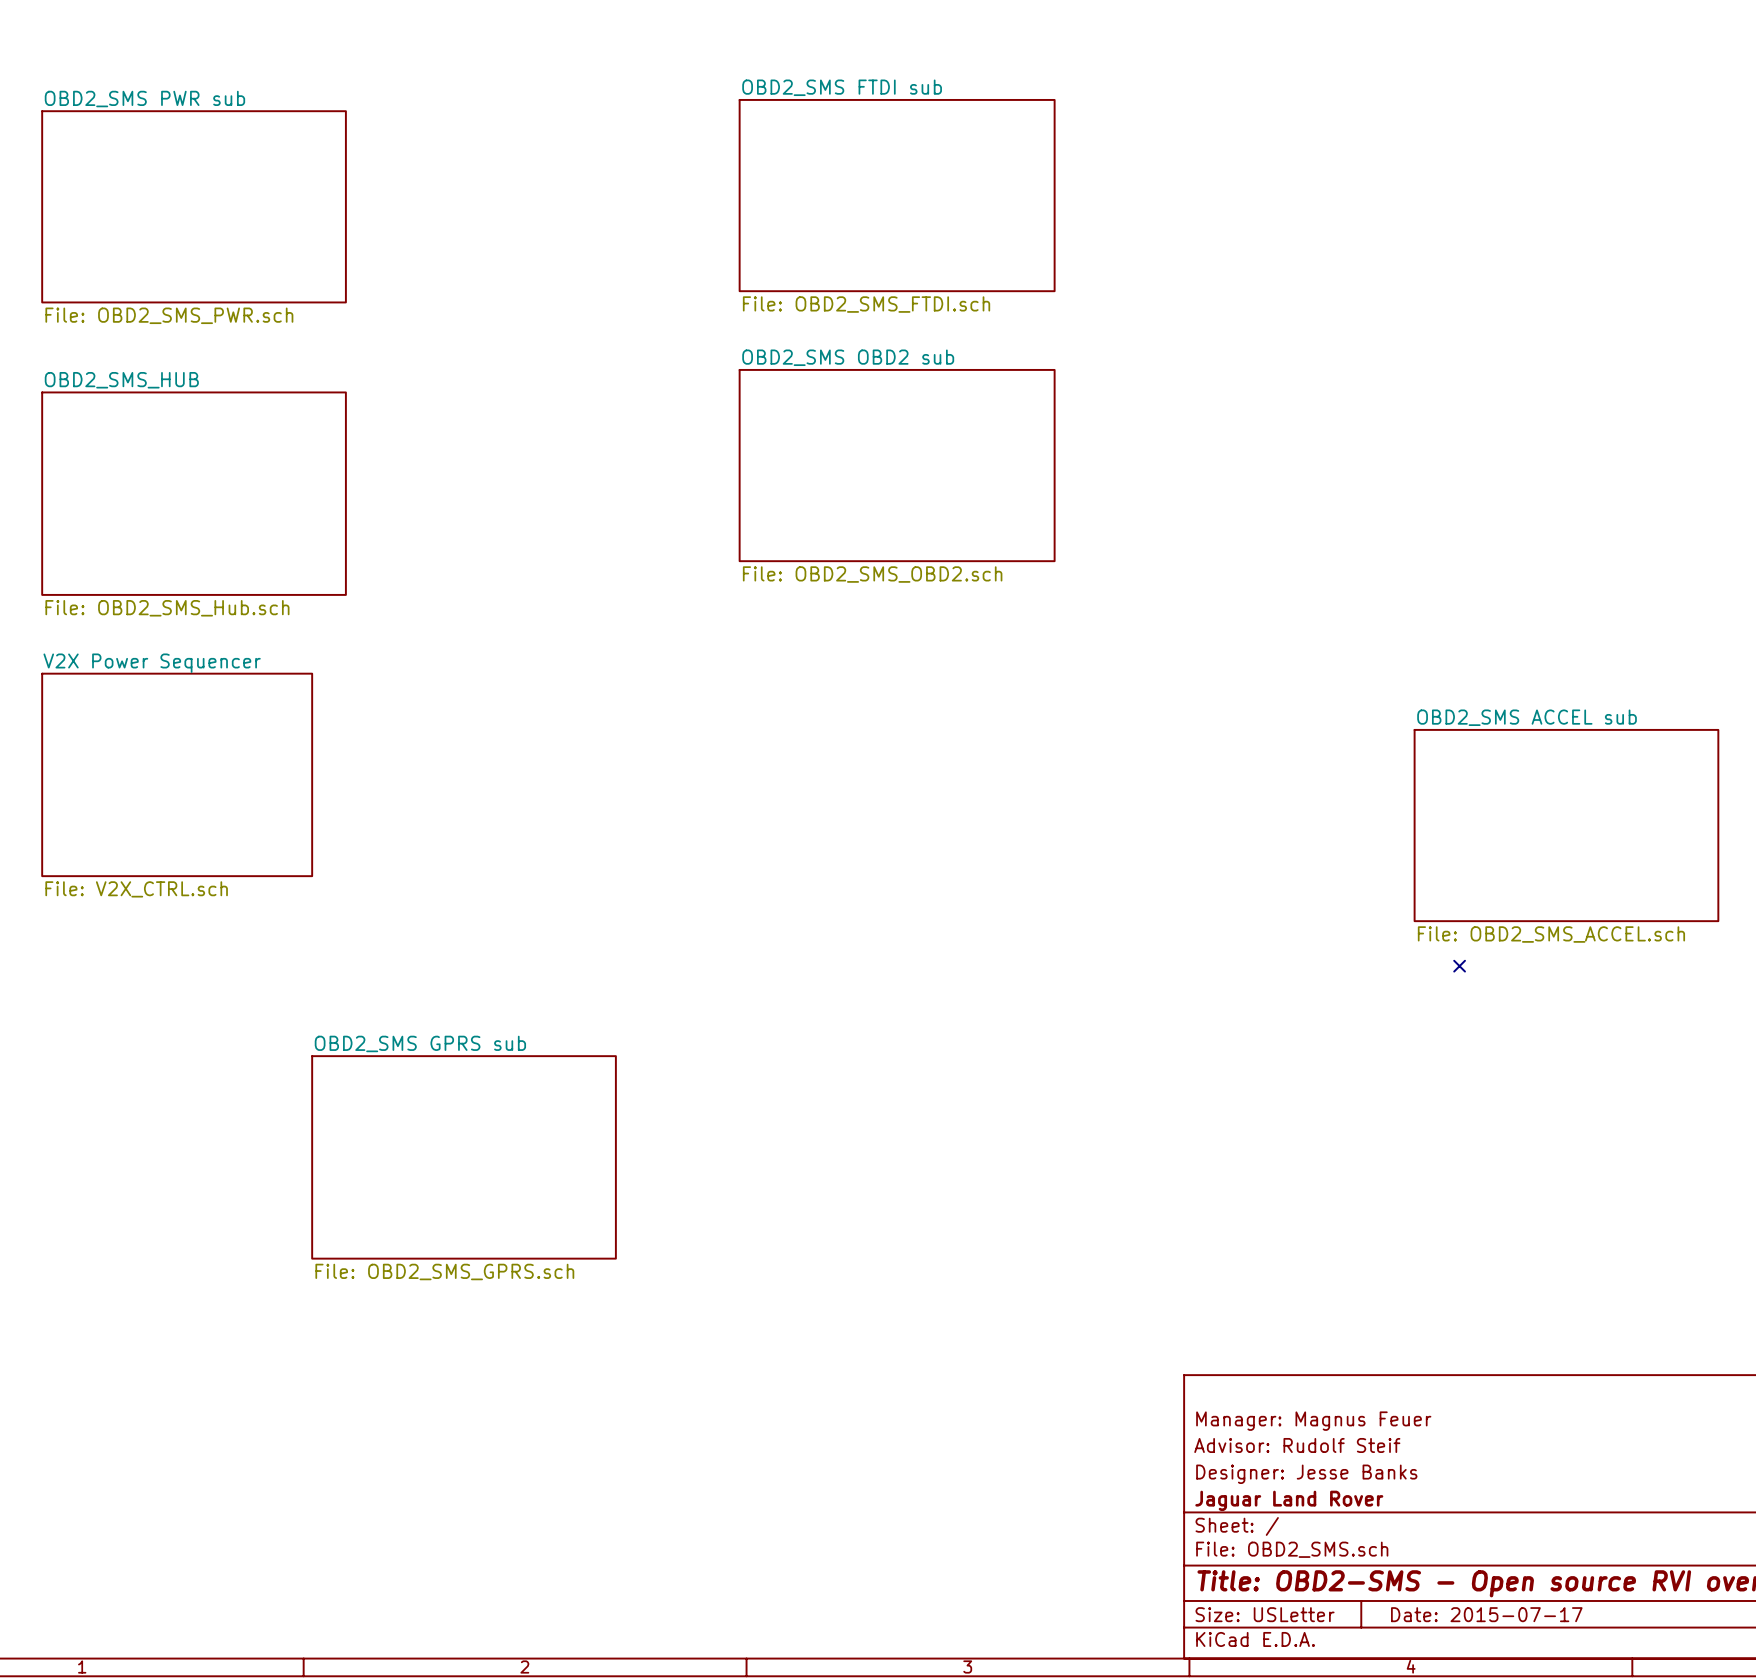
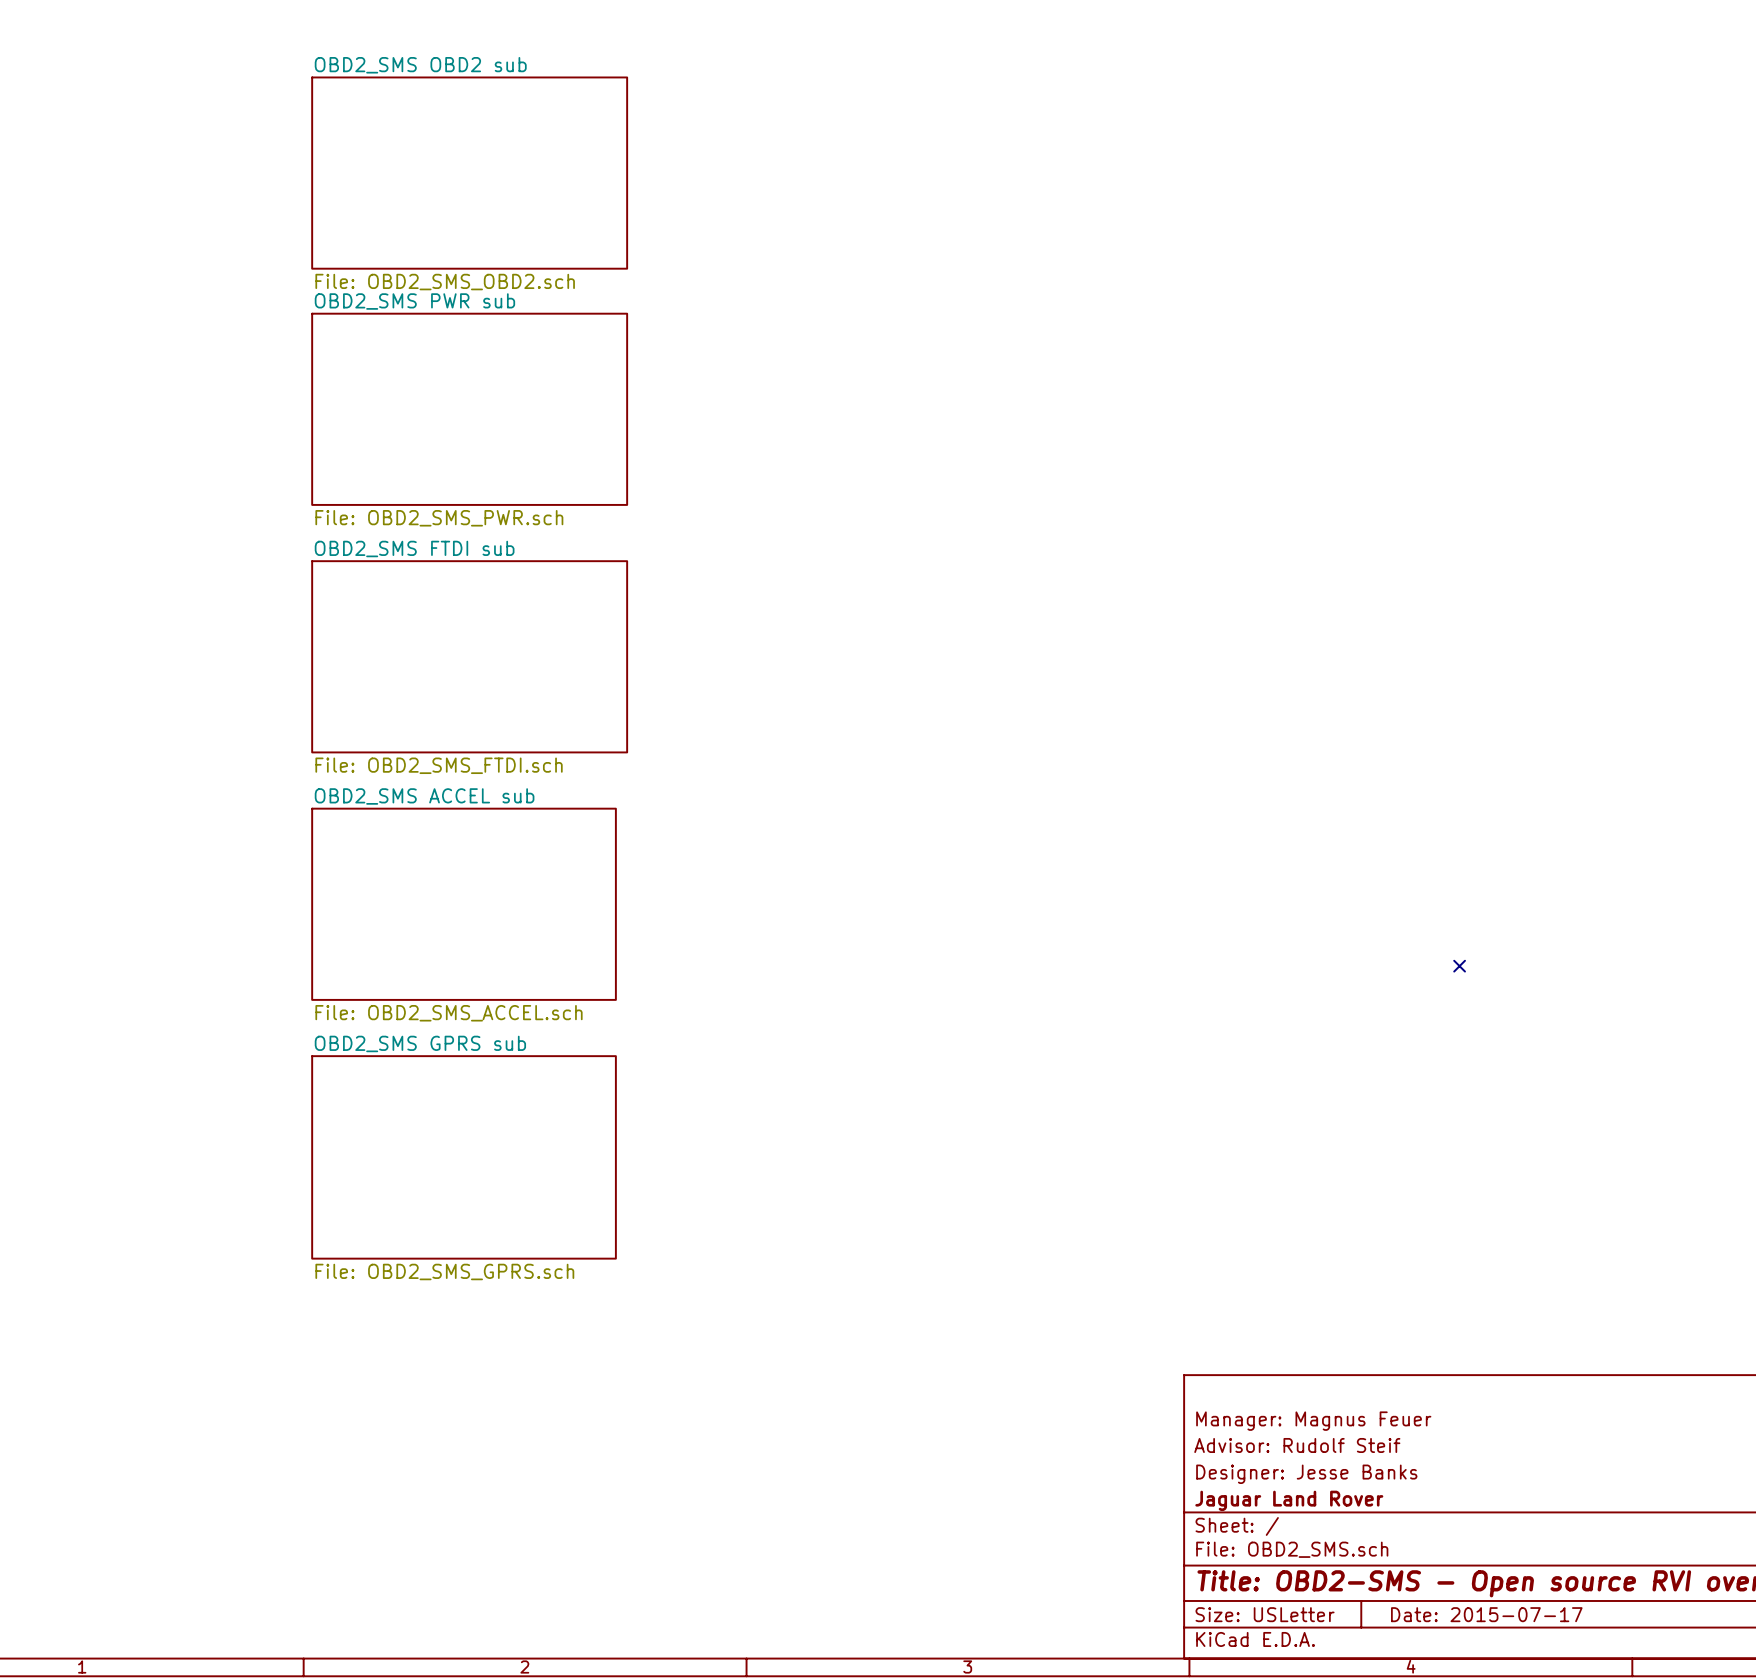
sheet OBD2_SMS PWR sub shape: [42, 111, 346, 303] -> [312, 313, 628, 505]
sheet OBD2_SMS FTDI sub position: (897, 195) -> (469, 656)
sheet OBD2_SMS OBD2 sub position: (897, 465) -> (469, 173)
sheet OBD2_SMS_HUB: File: OBD2_SMS_Hub.sch (194, 493) -> none
sheet V2X Power Sequencer: File: V2X_CTRL.sch (177, 774) -> none
sheet OBD2_SMS ACCEL sub position: (1566, 825) -> (464, 904)

